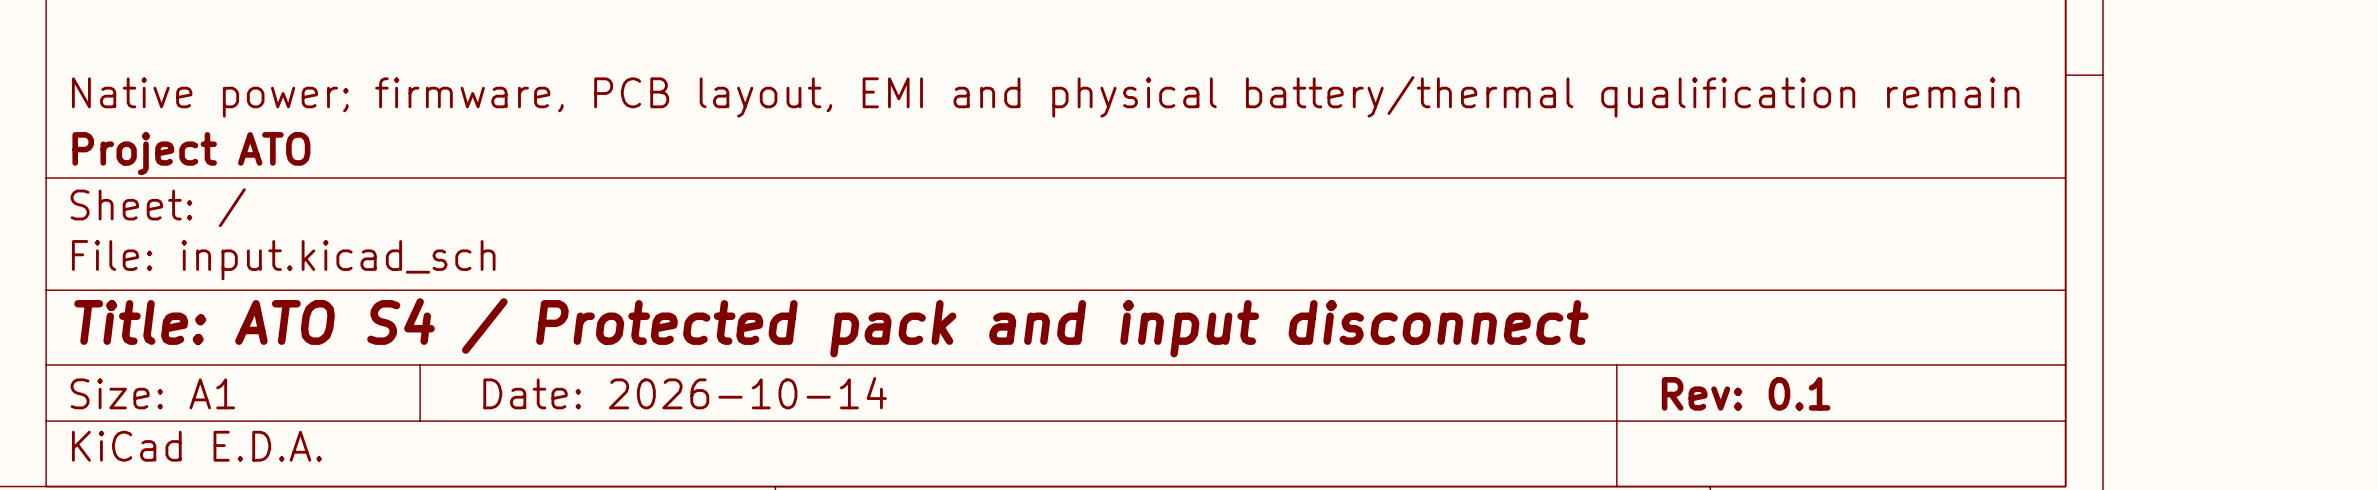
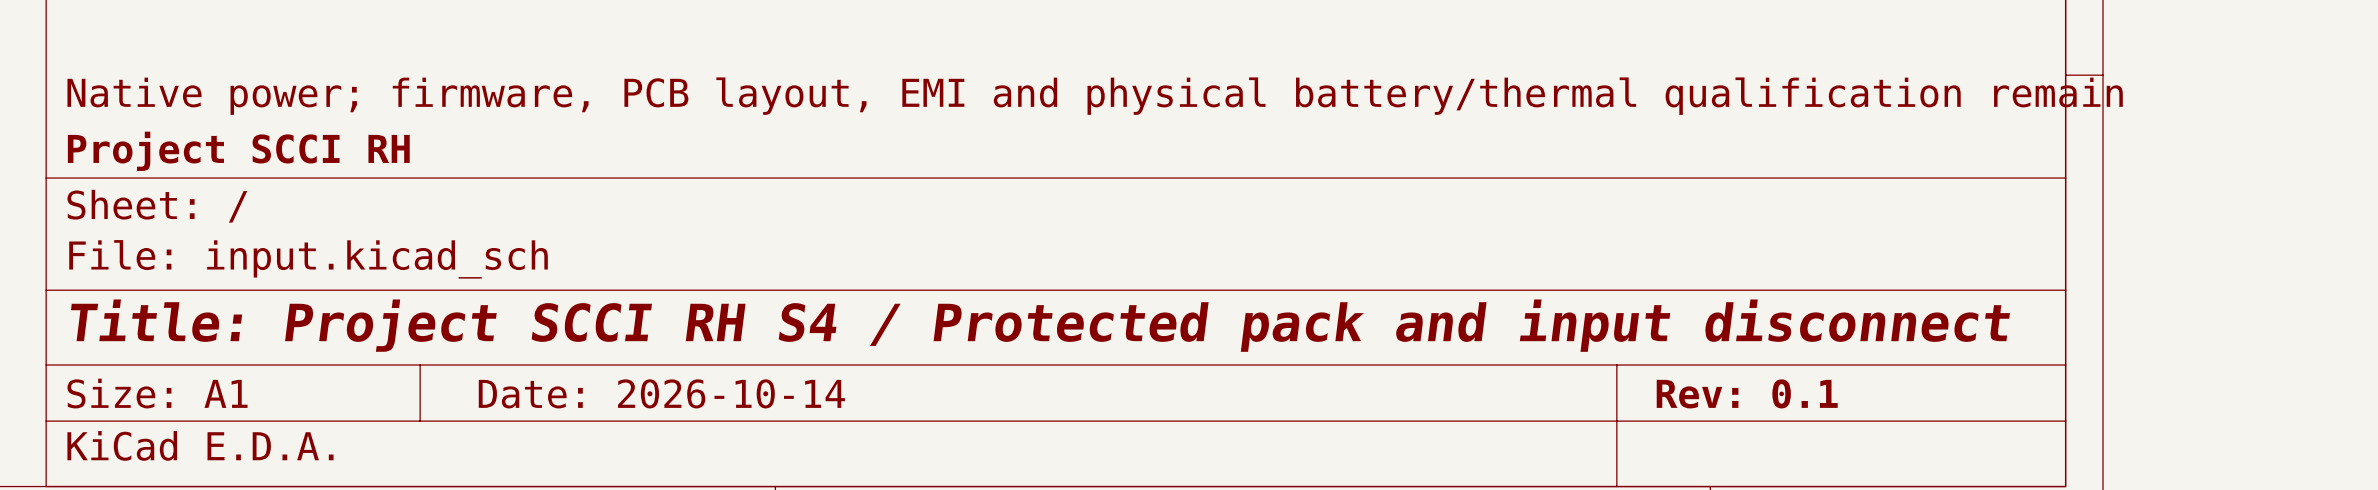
title block: Project ATO (191, 153) -> Project SCCI RH (238, 151)
title block: Title: ATO S4 / Protected pack and input disconnect (831, 327) -> Title: Project SCCI RH S4 / Protected pack and input disconnect (1040, 325)

